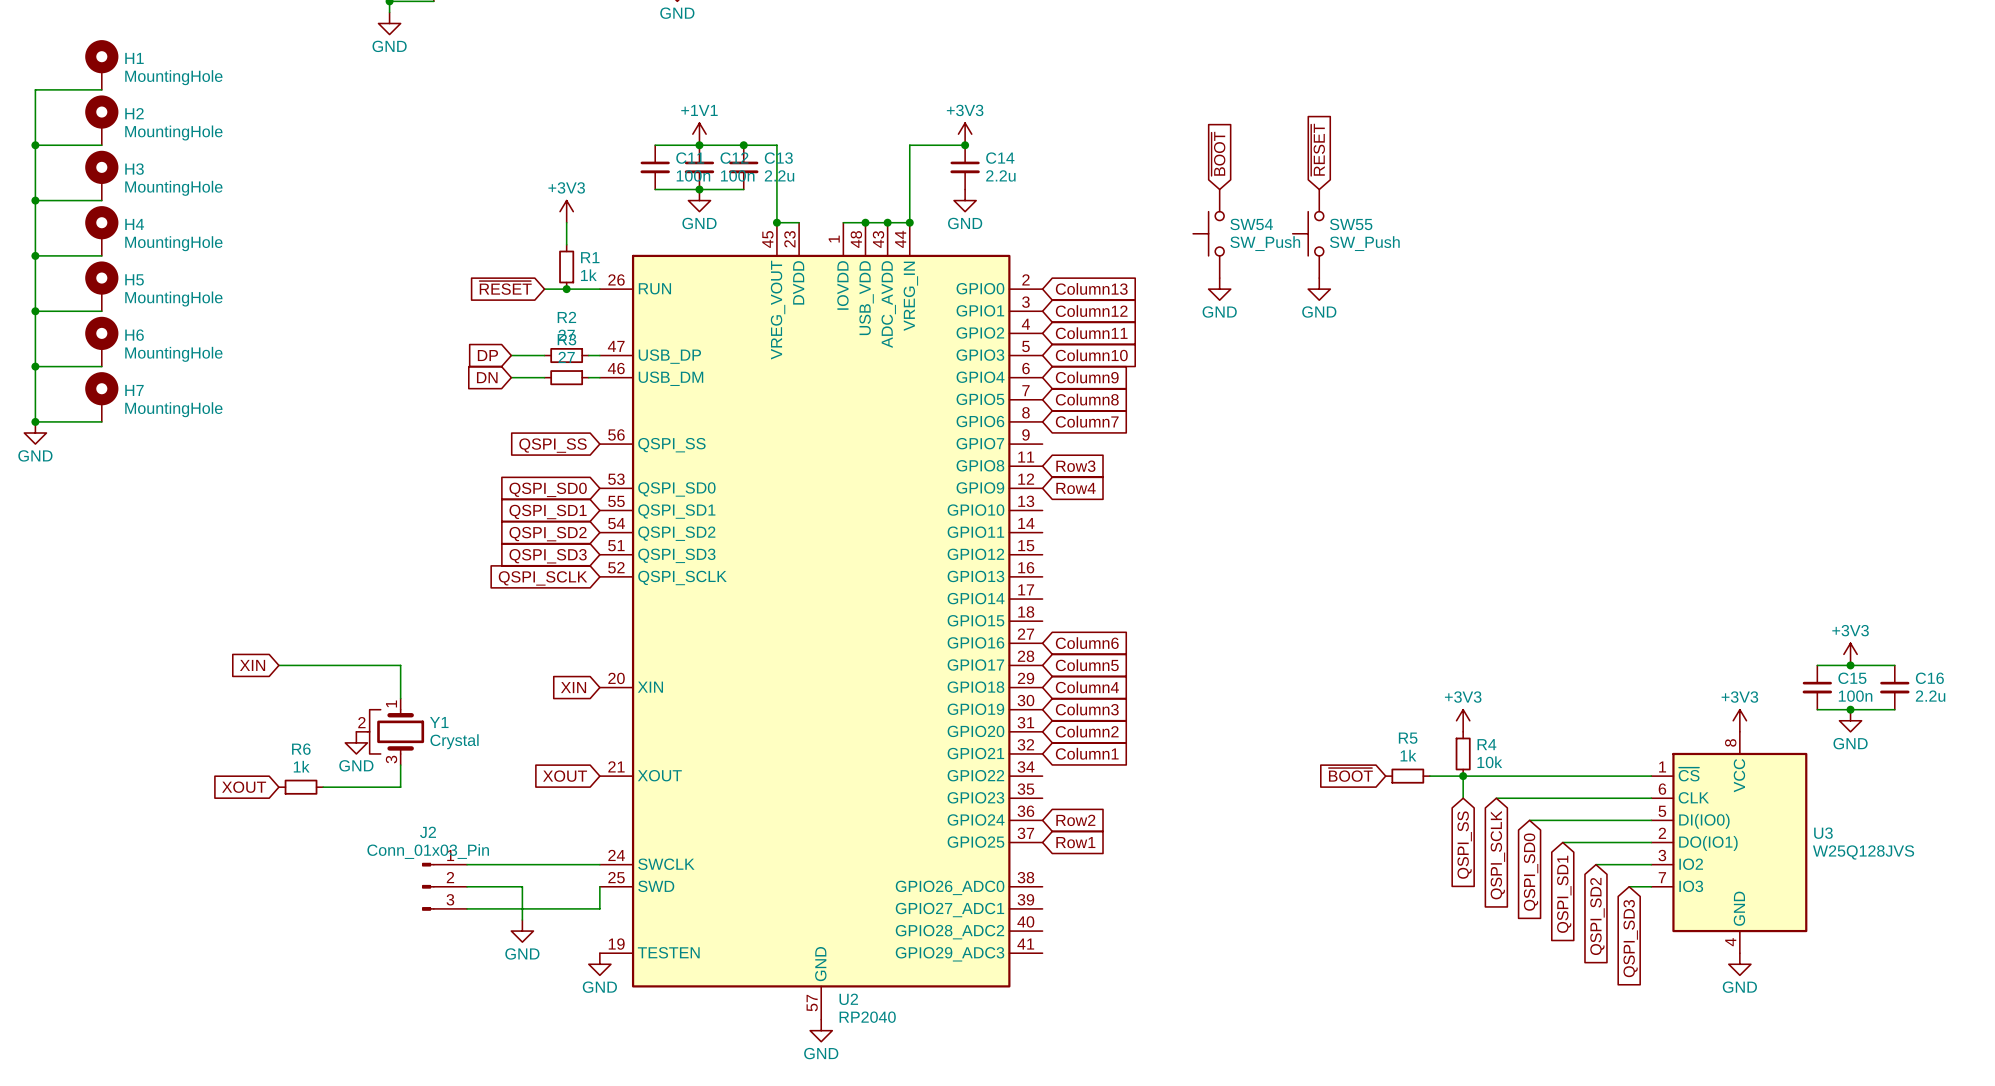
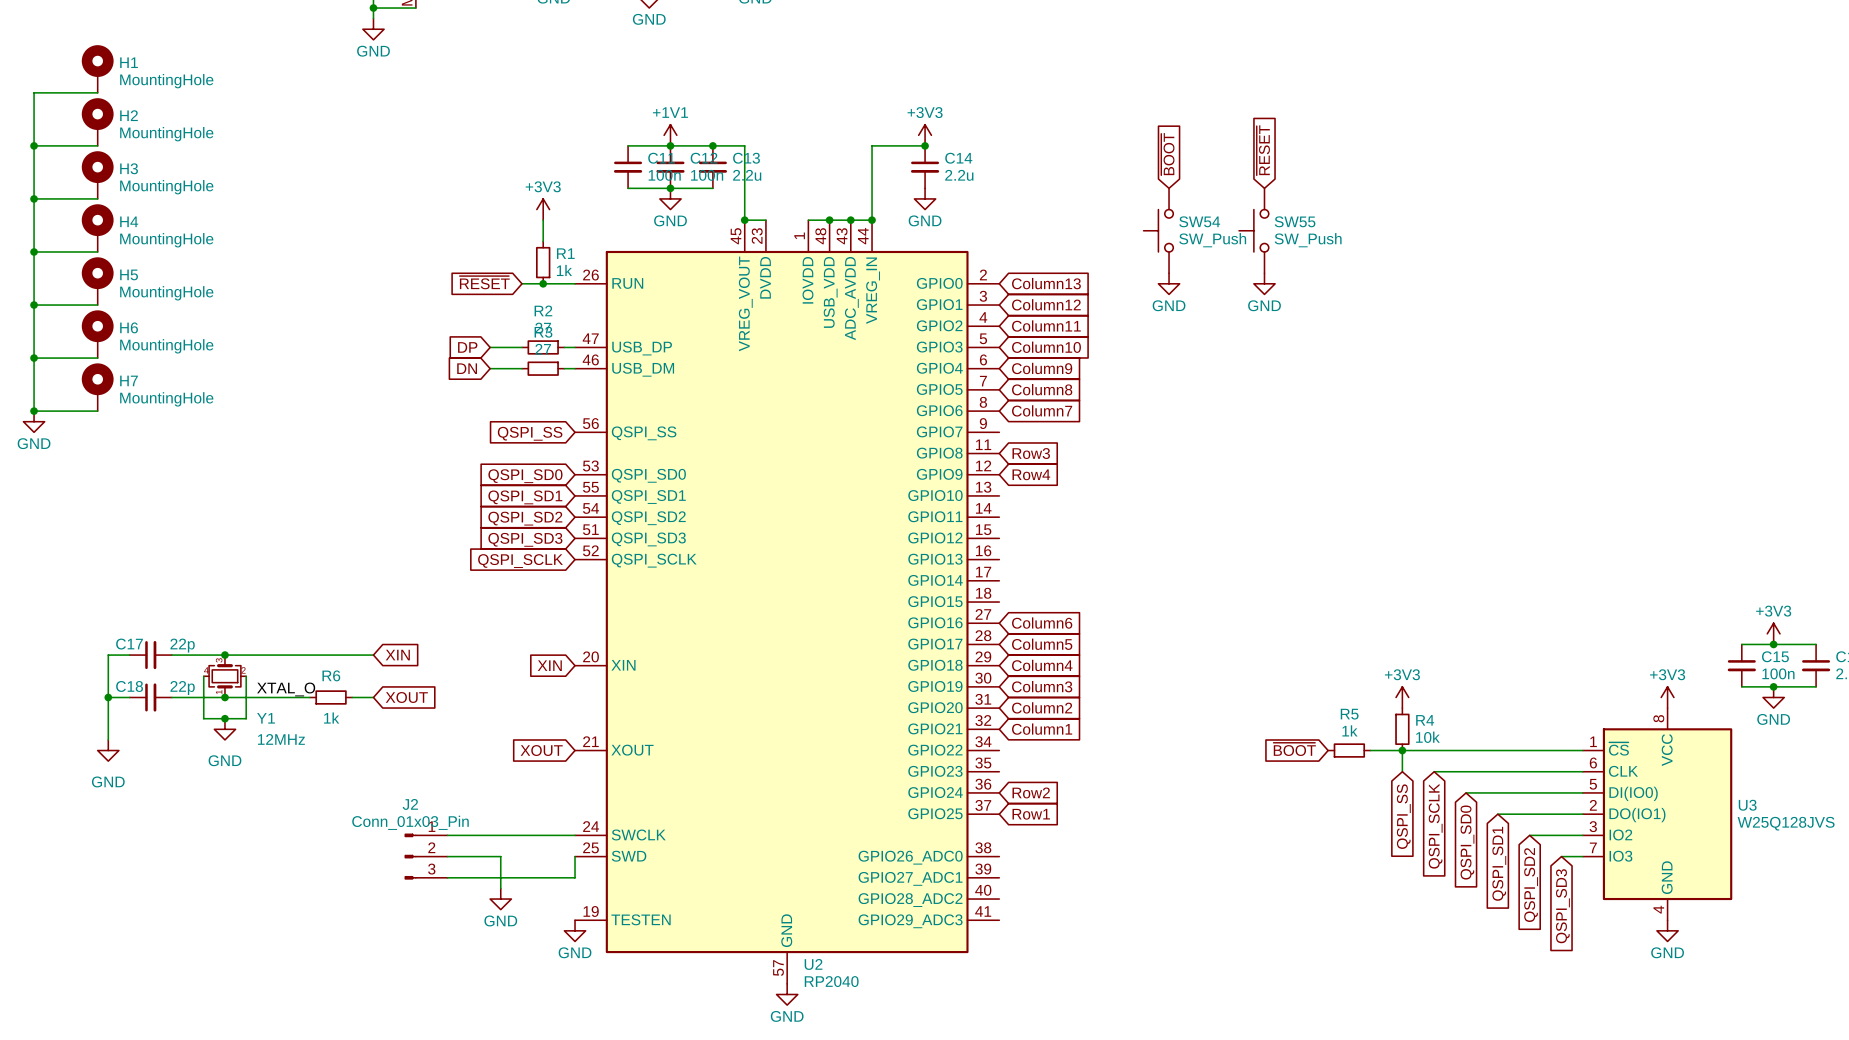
global label rotation: 0° (252, 665) -> 180° (397, 655)
global label position: XIN (252, 665) -> XIN (397, 655)
wire: (278, 665) (400, 665) (400, 698) -> none
wire: none -> (129, 655) (108, 655) (108, 739)
C17: none -> 22p (150, 655)
wire: none -> (171, 655) (373, 655)
junction: none -> (224, 655)
wire: none -> (203, 676) (203, 718) (246, 718) (246, 676)
Y1 symbol: [356, 698, 425, 766] -> [203, 655, 247, 698]
label: none -> XTAL_O (286, 689)
wire: none -> (108, 697) (129, 697)
junction: none -> (108, 697)
C18: none -> 22p (150, 697)
wire: none -> (171, 697) (309, 697)
junction: none -> (224, 697)
Y1 name position: Y1 (439, 722) -> Y1 (266, 718)
Y1 value: Crystal (454, 741) -> 12MHz (281, 739)
junction: none -> (224, 718)
power symbol position: GND (356, 742) -> GND (224, 729)
R6 name position: R6 (301, 749) -> R6 (331, 675)
power symbol text position: GND (356, 765) -> GND (224, 760)
wire: (400, 765) (400, 787) (323, 787) -> none
R6 value position: 1k (301, 766) -> 1k (331, 718)
power symbol: none -> GND (108, 750)
global label rotation: 0° (244, 787) -> 180° (406, 697)
global label position: XOUT (244, 787) -> XOUT (406, 697)
R6 position: (301, 787) -> (331, 697)

